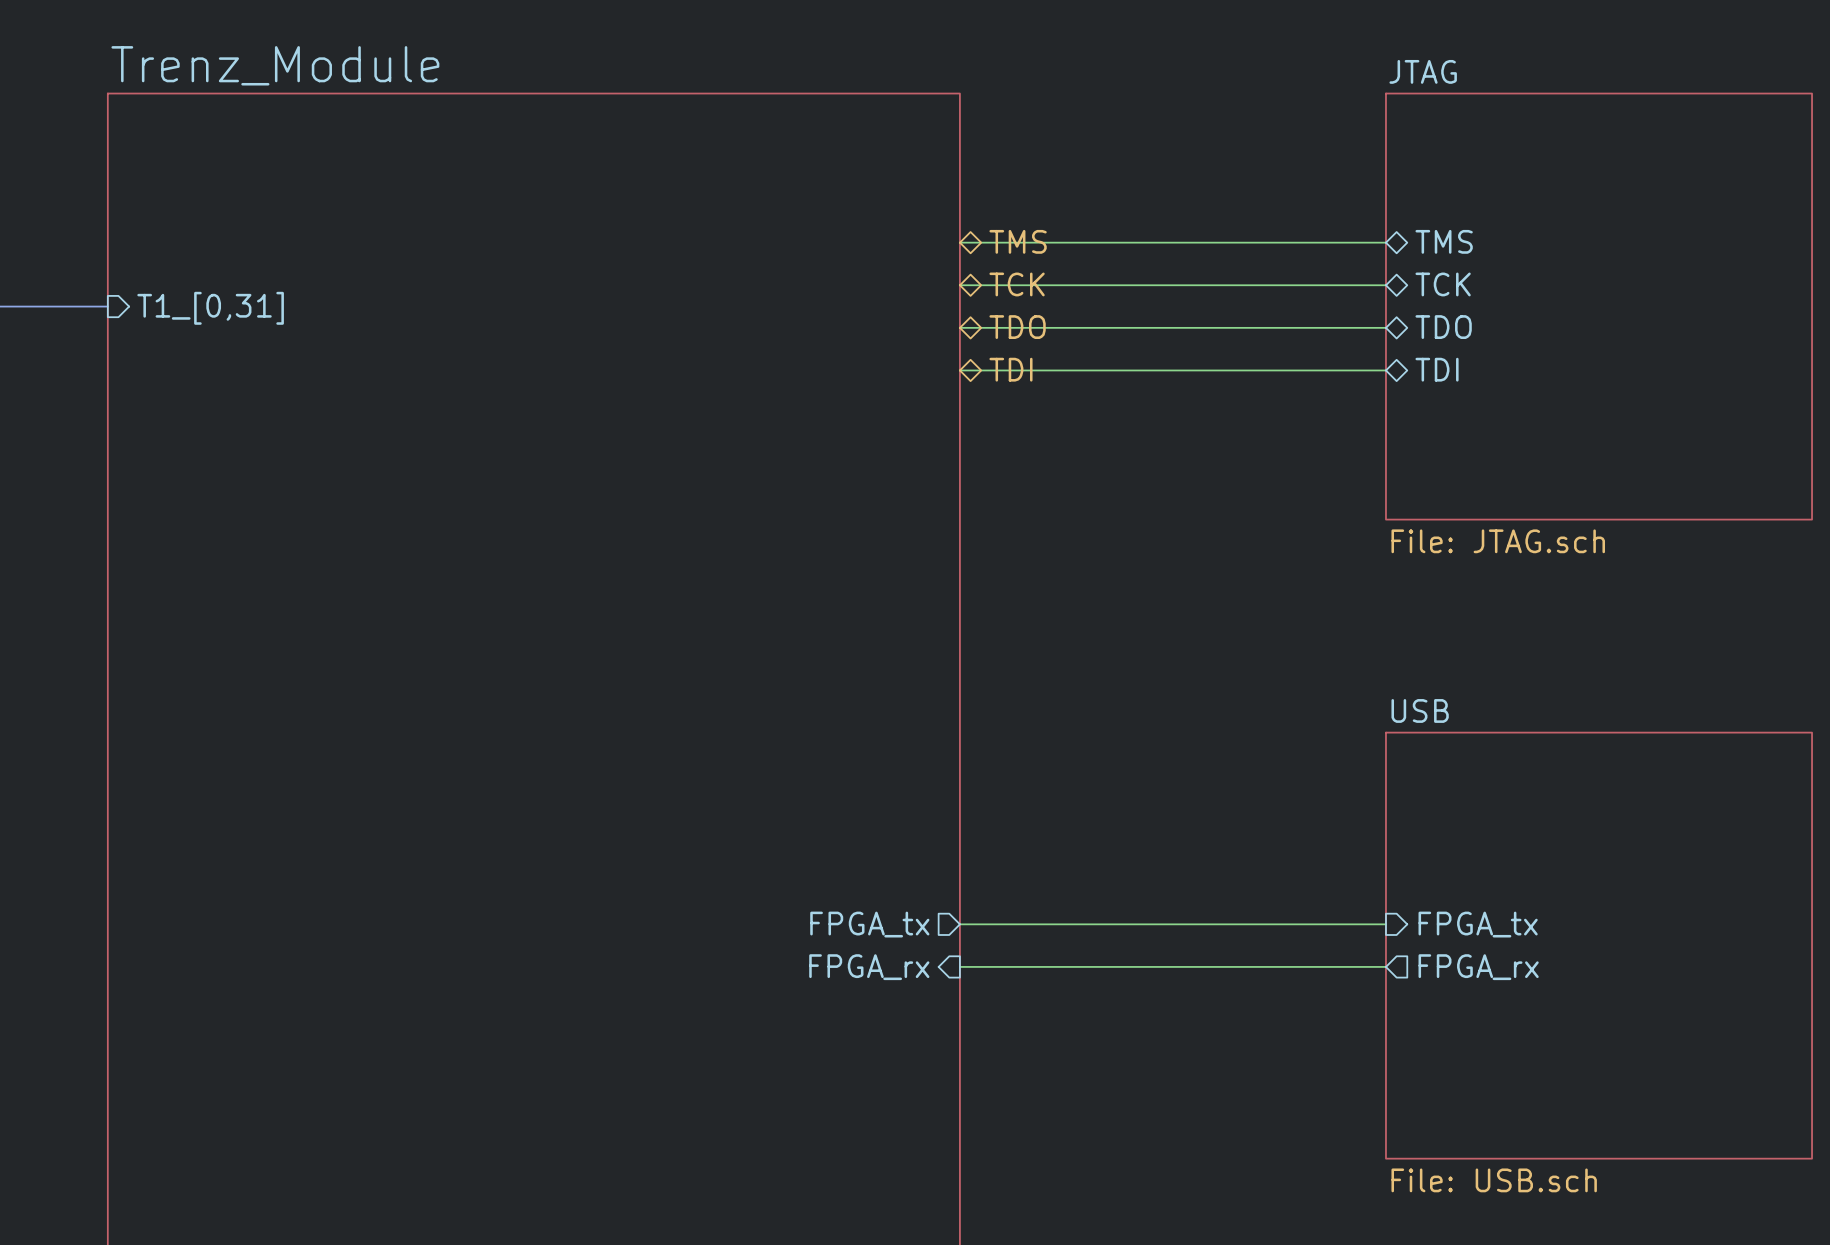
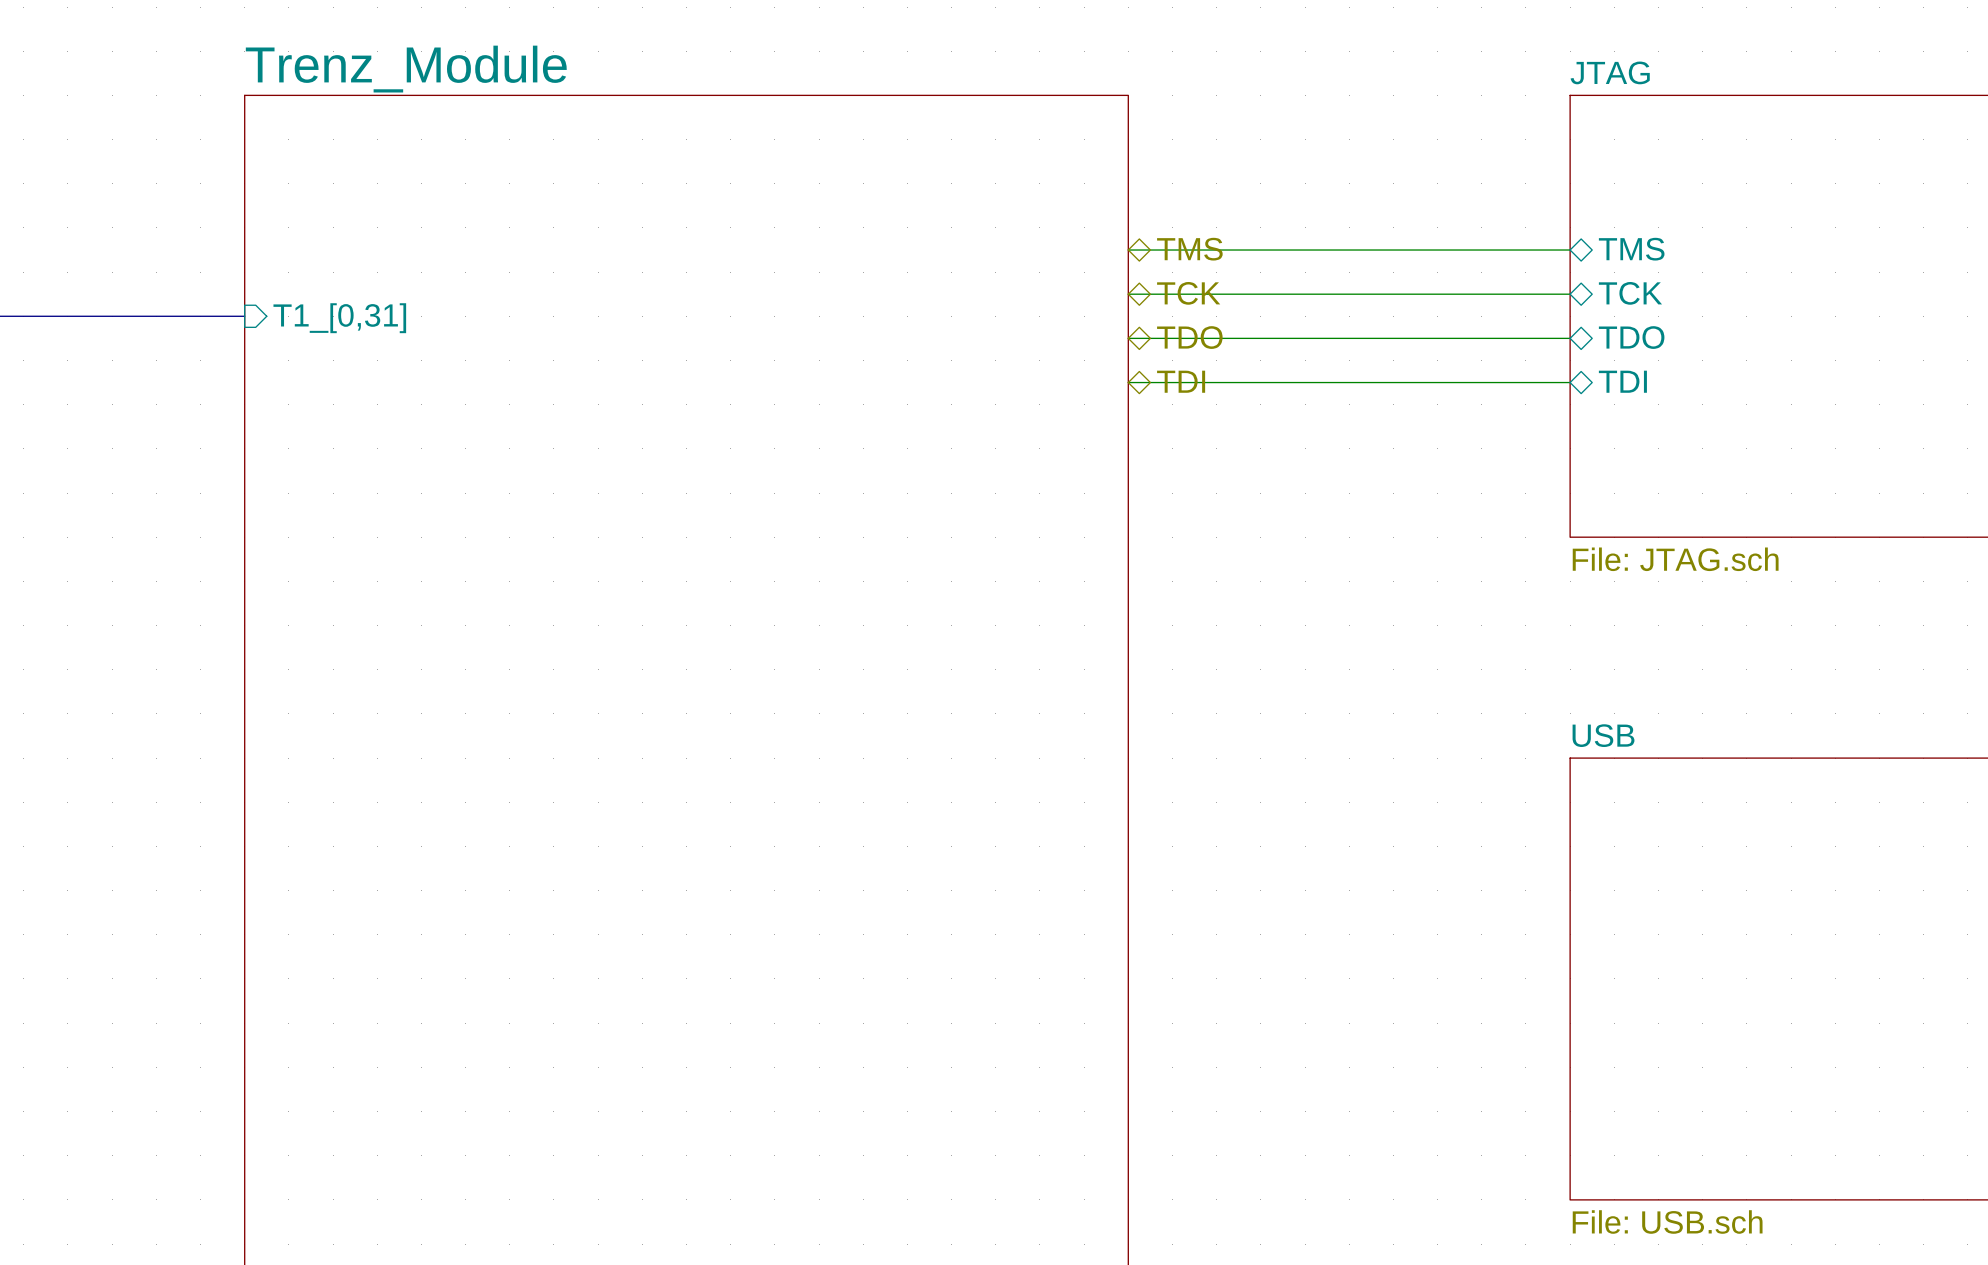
sheet pin: FPGA_tx (869, 924) -> none
wire: (959, 924) (1385, 924) -> none
sheet pin: FPGA_tx (1478, 924) -> none
wire: (959, 966) (1385, 966) -> none
sheet pin: FPGA_rx (869, 967) -> none
sheet pin: FPGA_rx (1478, 967) -> none

